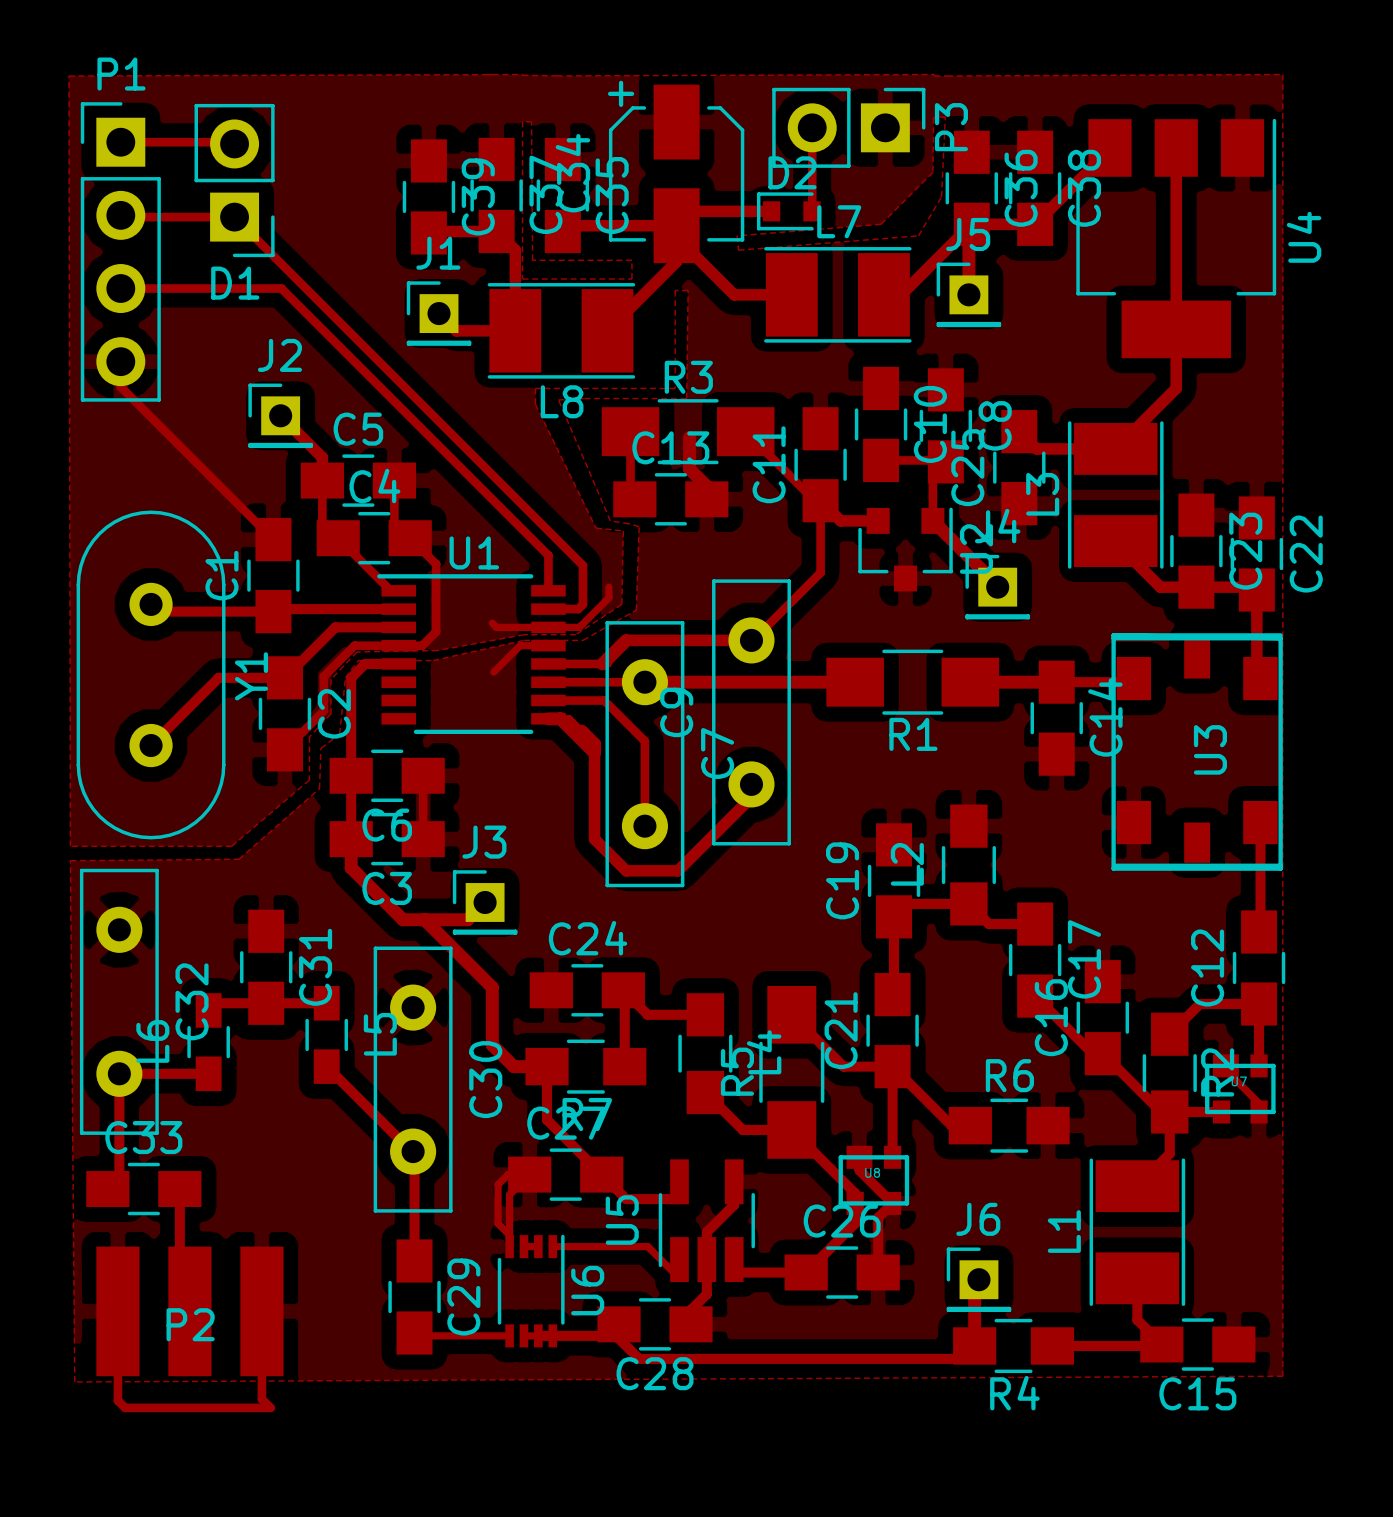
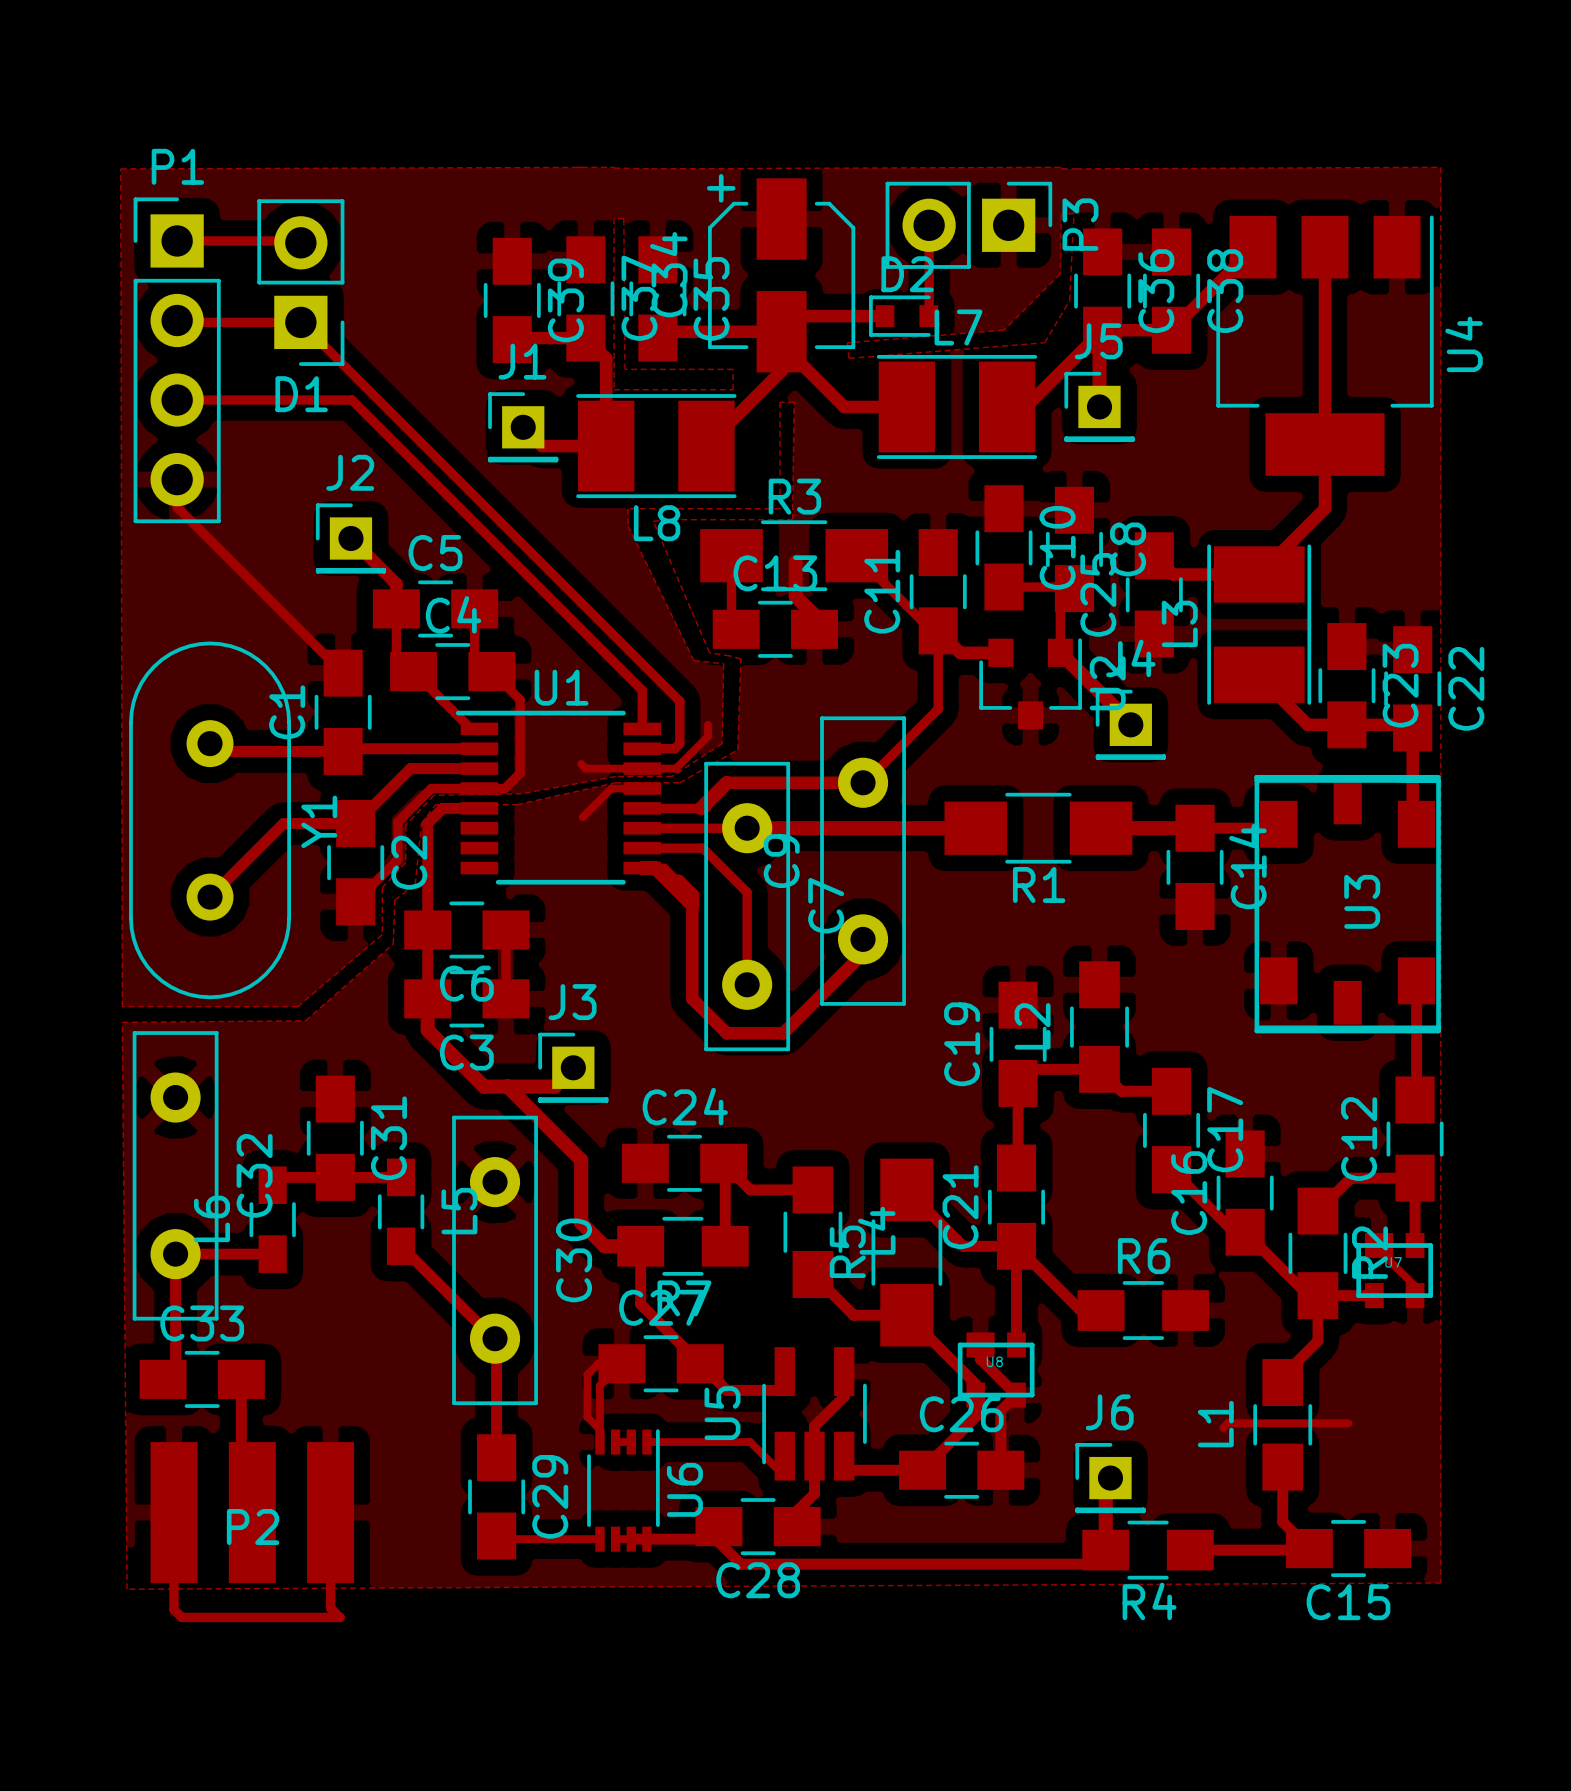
L1 footprint: [1089, 1158, 1186, 1306] -> [1253, 1359, 1313, 1491]
track: none -> (1348, 1423) (1227, 1423) (1223, 1427)

